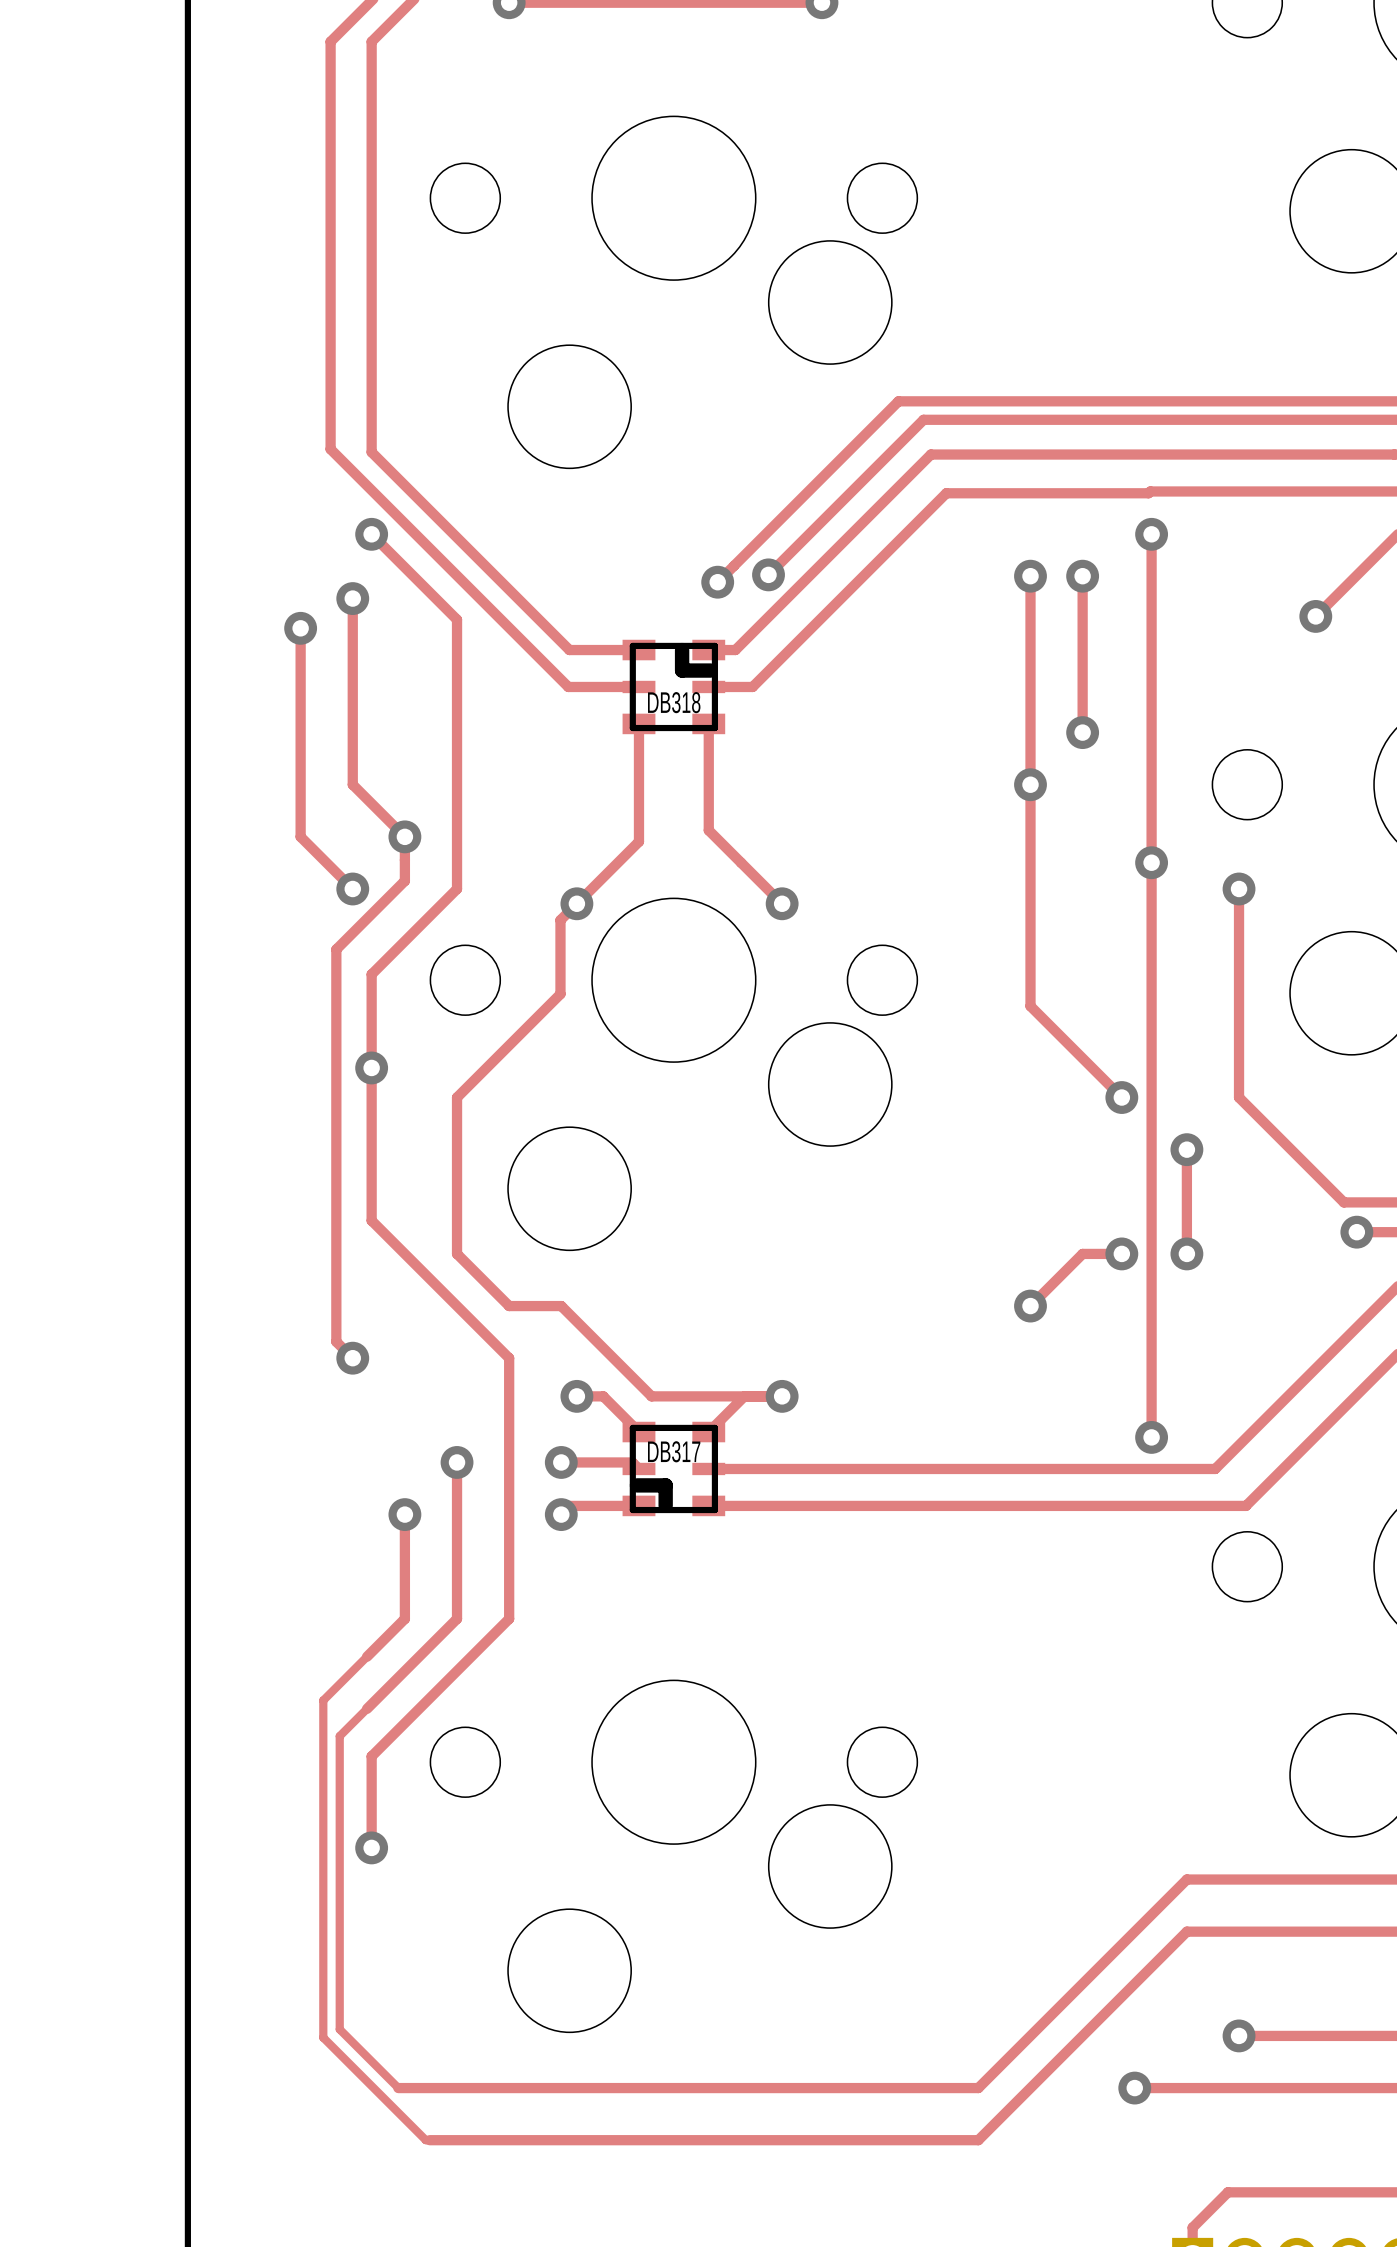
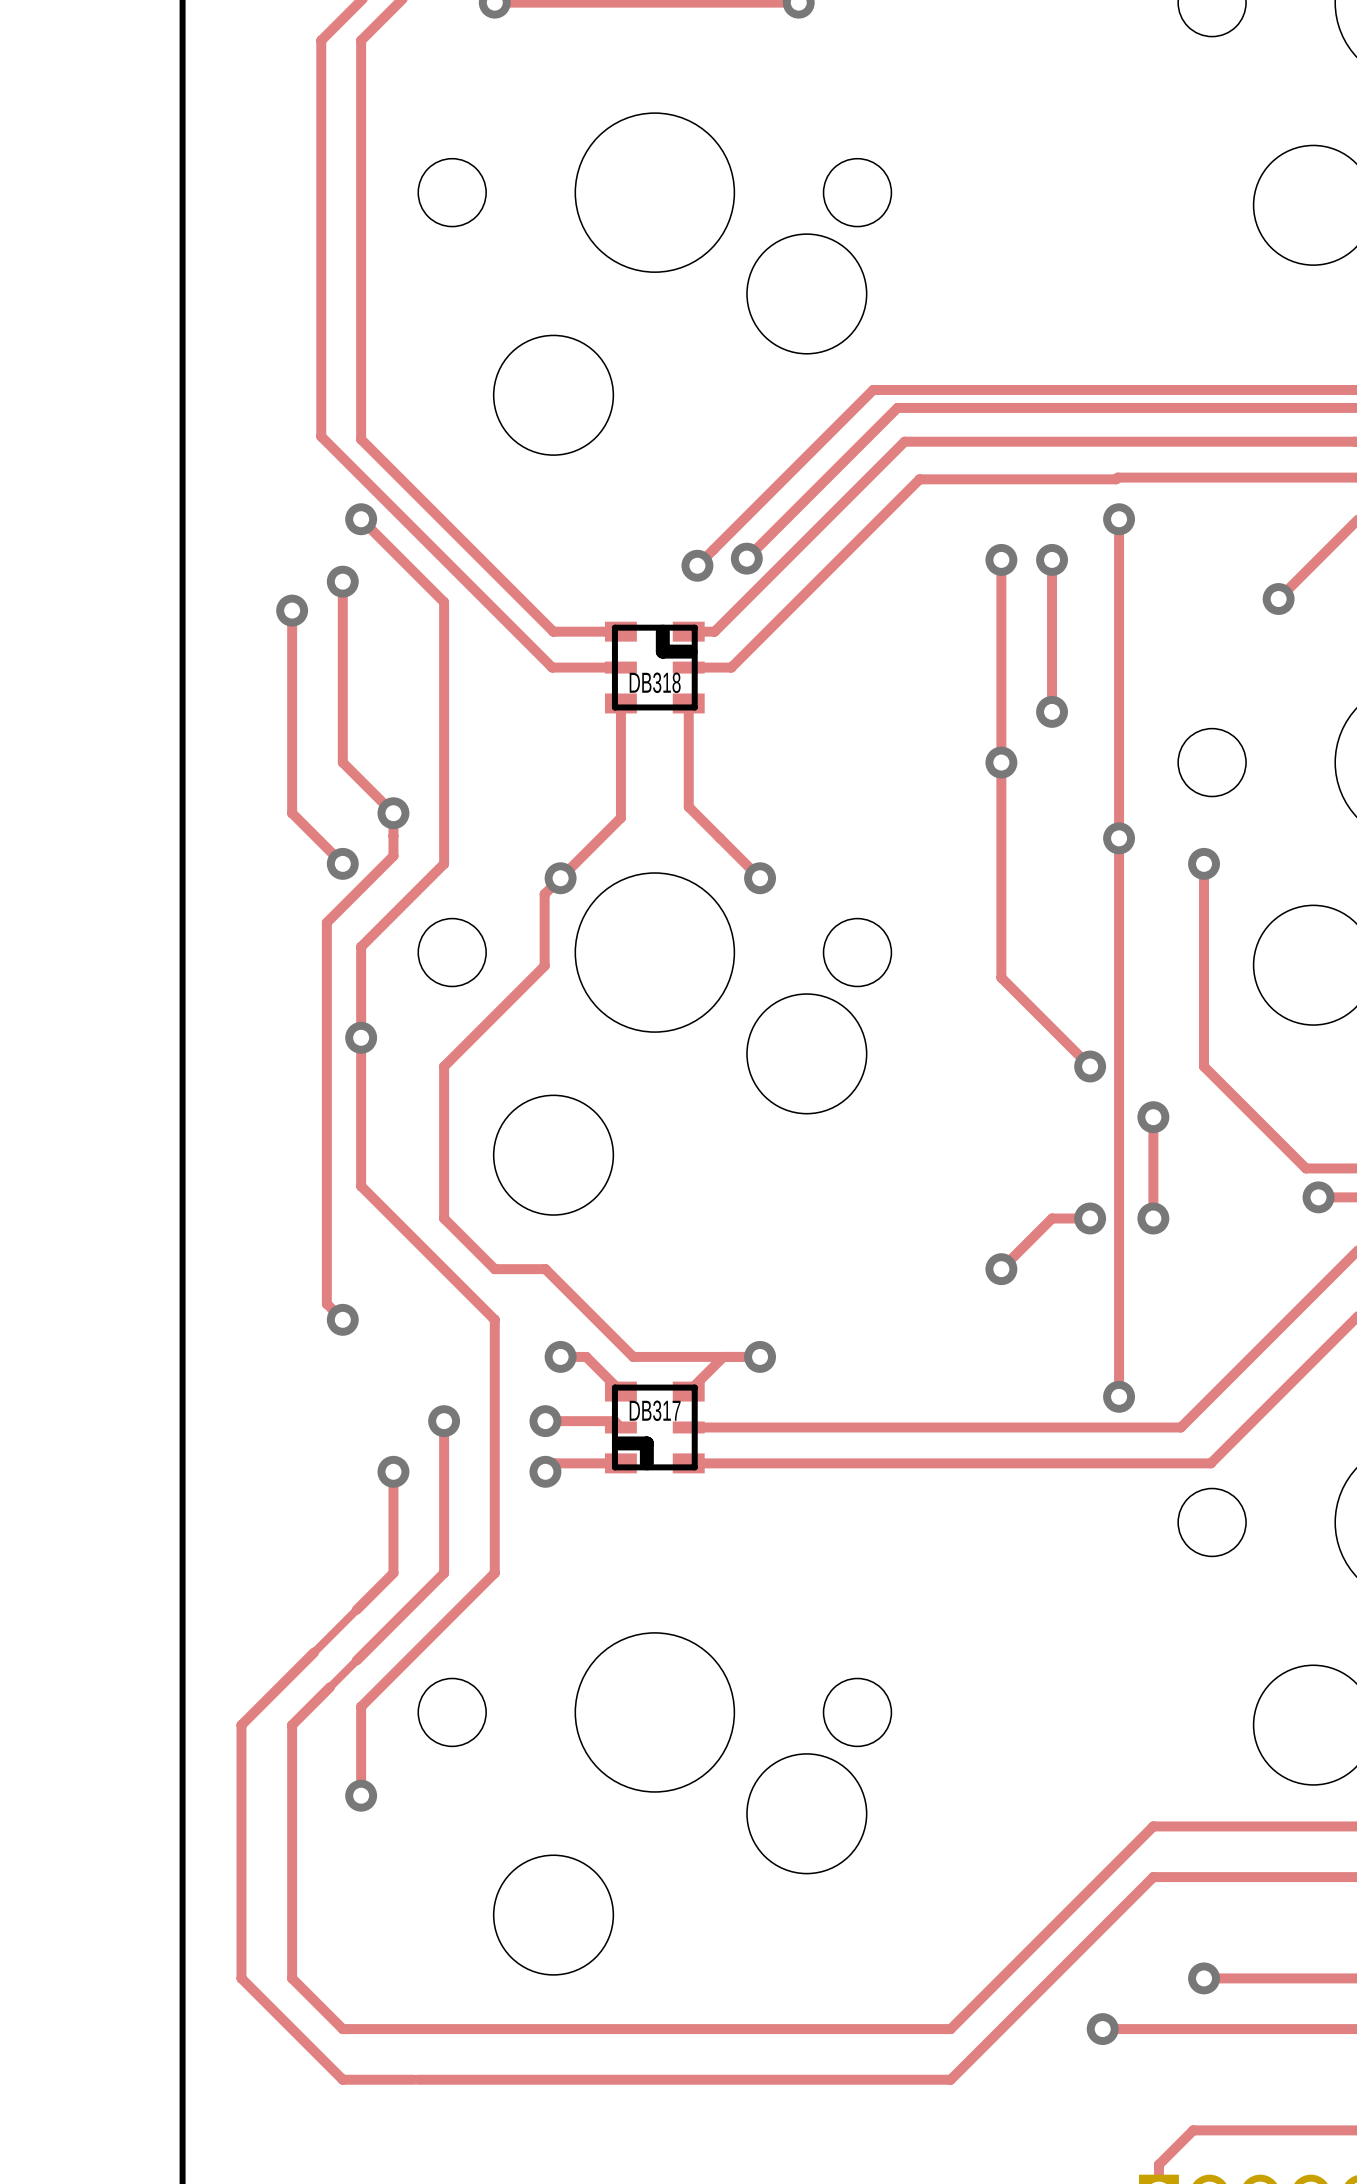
track: (323, 1700) (323, 2037) (425, 2140) -> (314, 1652) (241, 1725) (241, 1978) (342, 2079) (413, 2079)
track: (339, 1736) (339, 2029) (398, 2088) -> (330, 1687) (292, 1725) (292, 1978) (342, 2029) (387, 2029)

